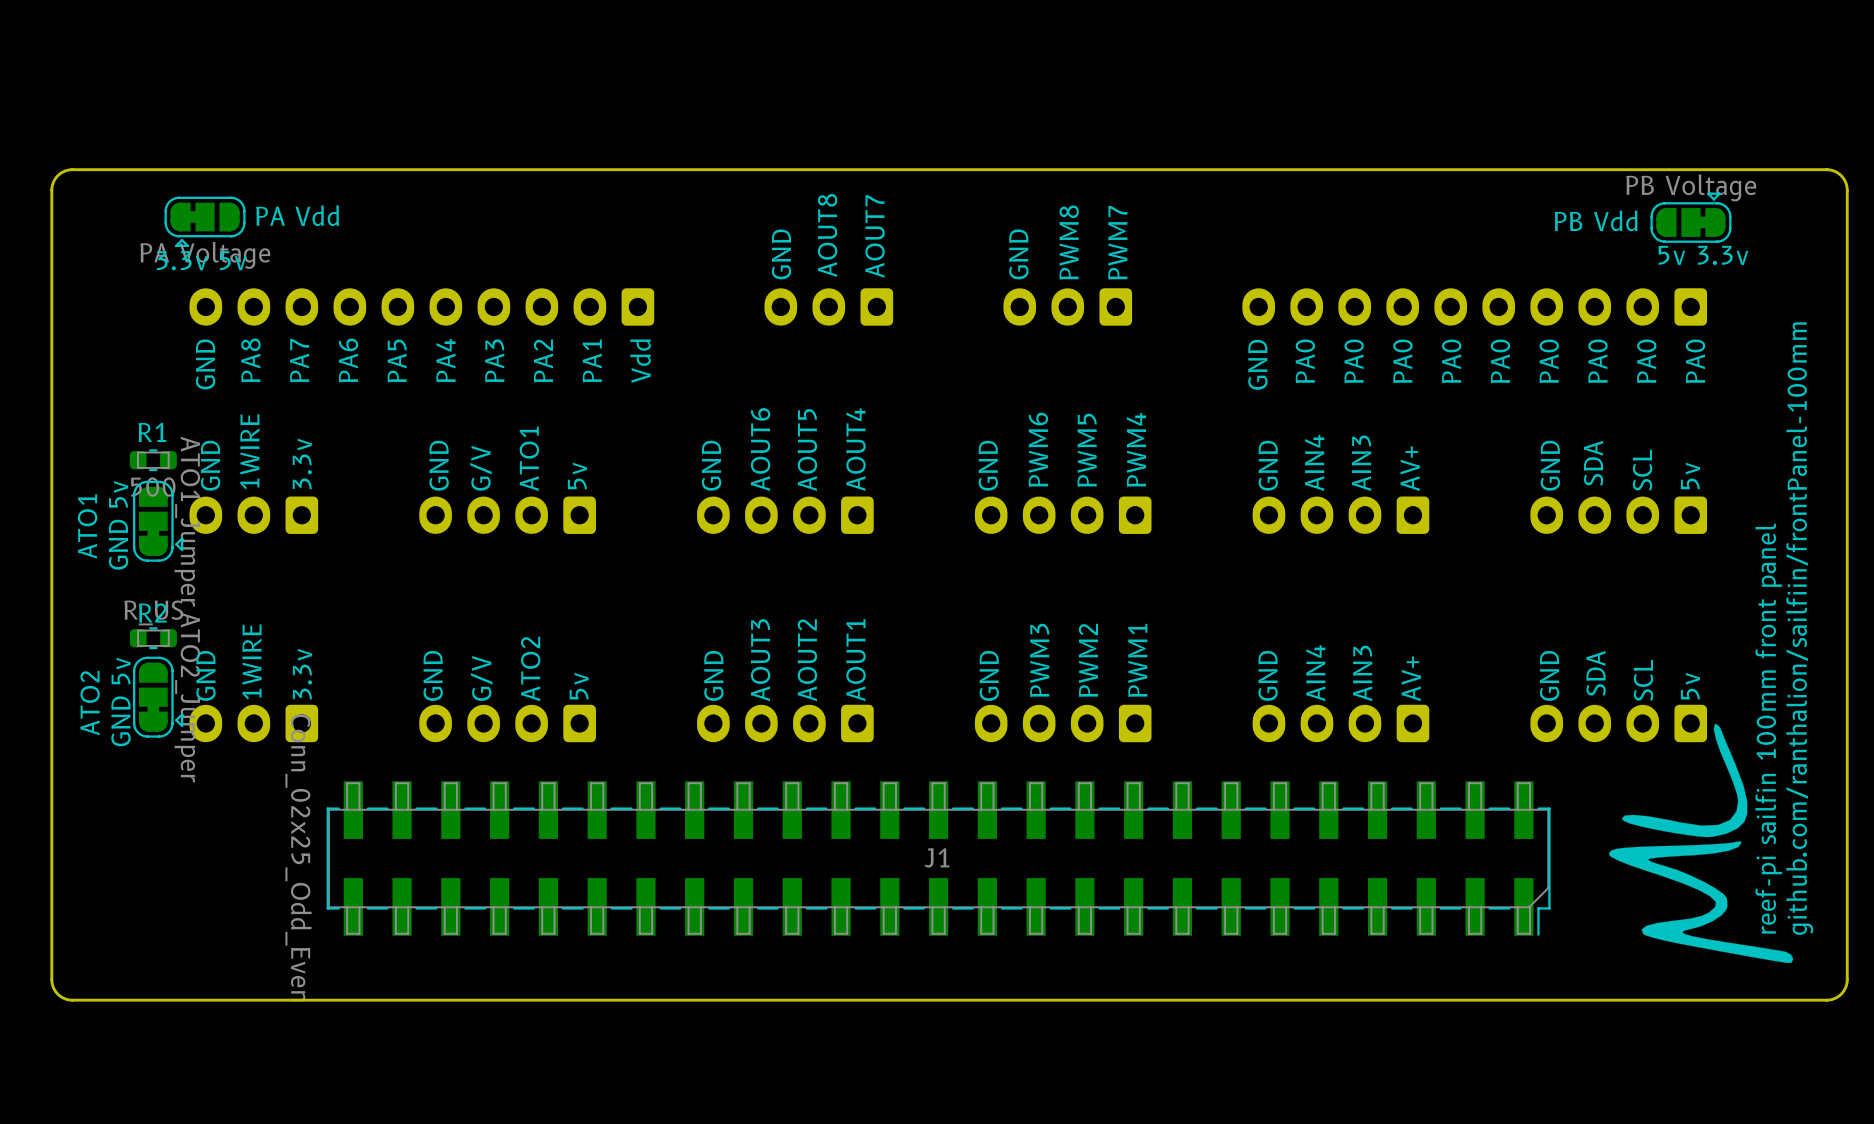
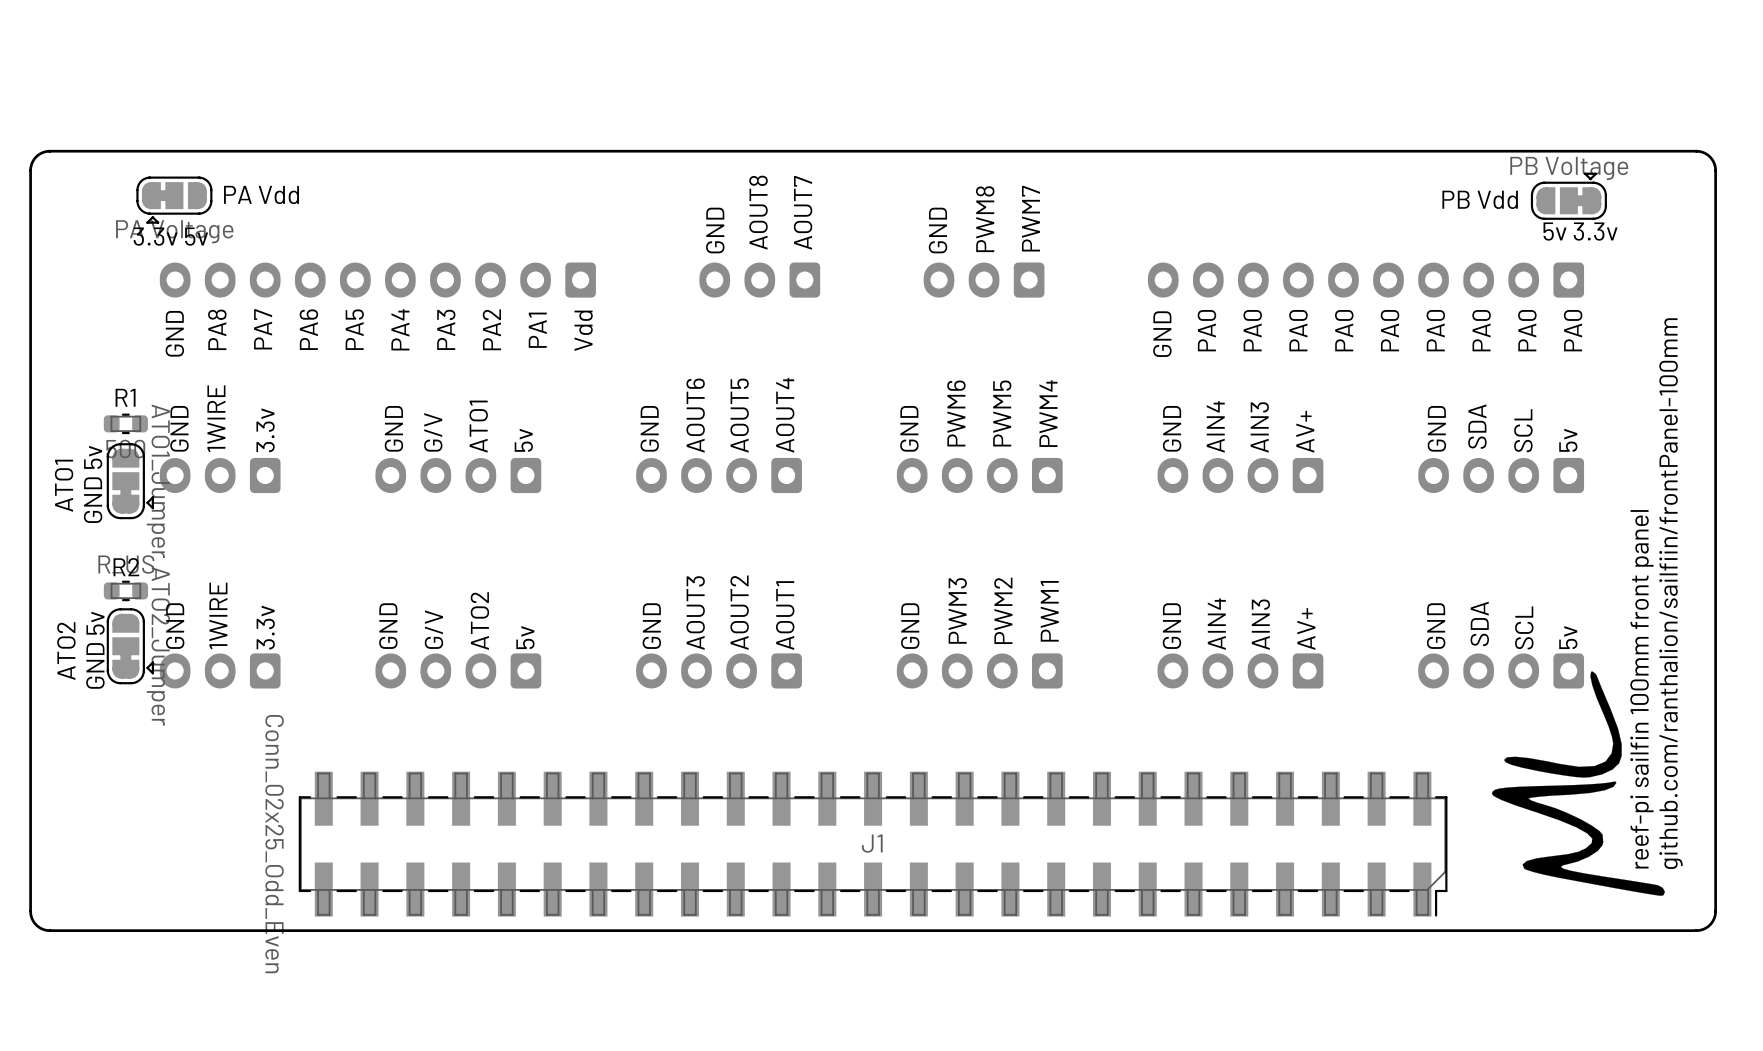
J1 position: (938, 858) -> (873, 844)

